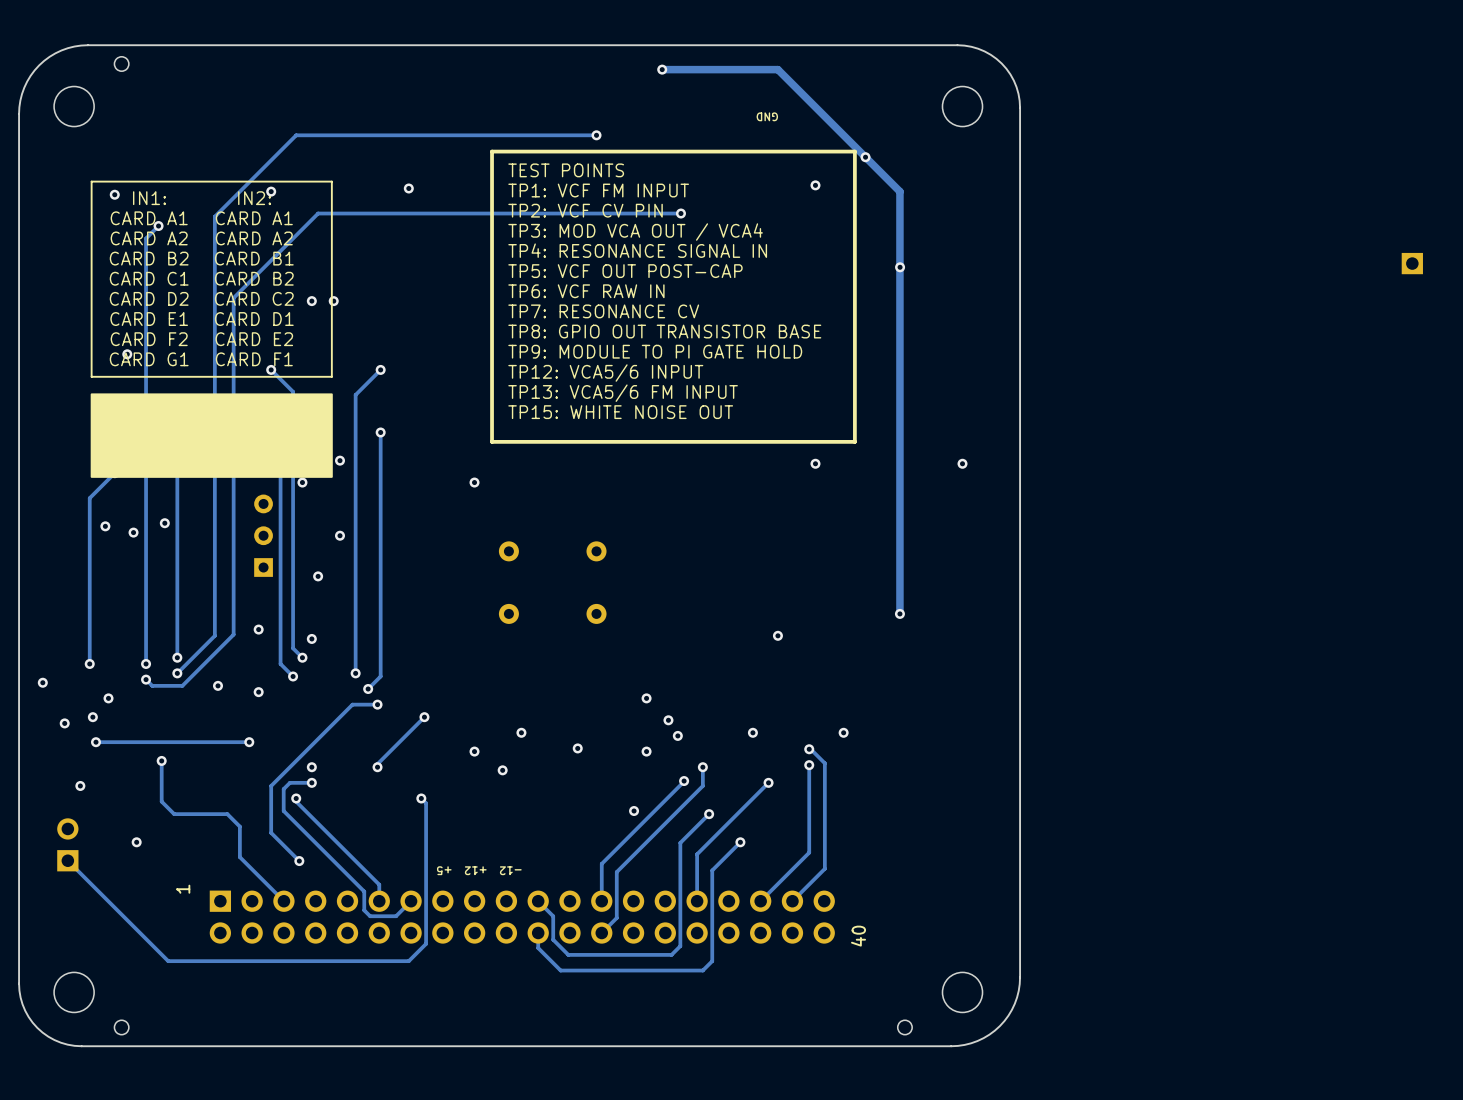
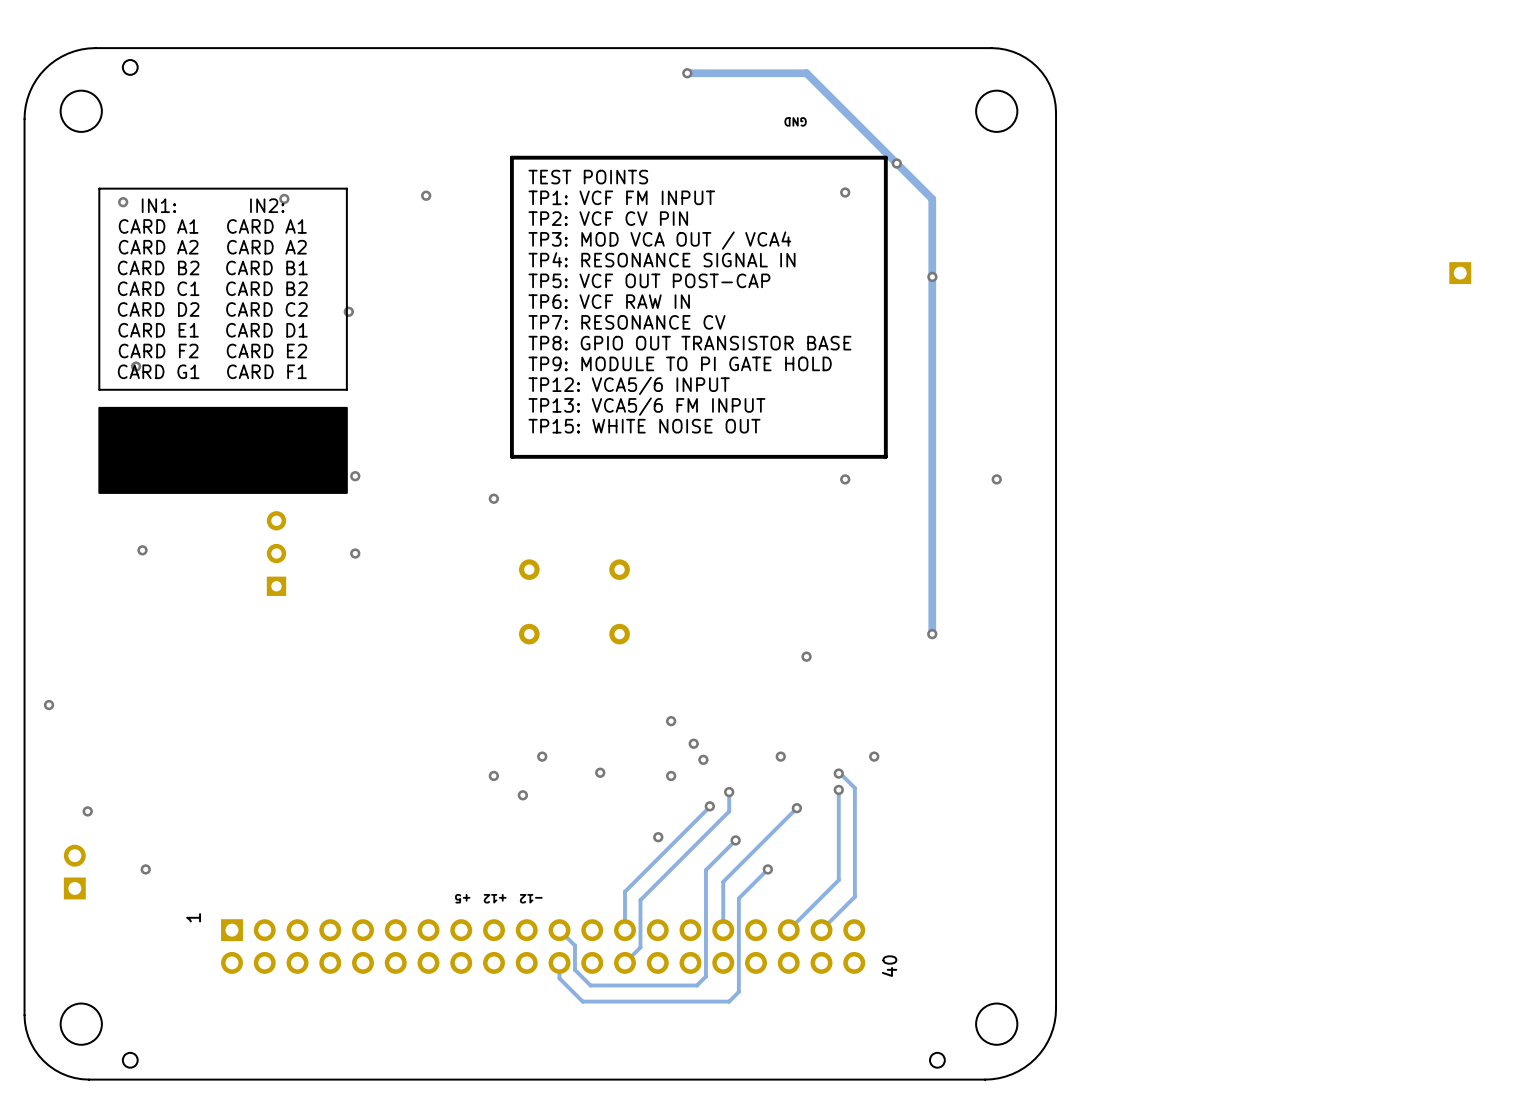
track: (596, 135) (296, 135) (214, 216) (214, 635) (177, 673) -> none
via: (596, 135) -> none
track: (680, 213) (318, 213) (233, 297) (233, 634) (182, 685) (152, 685) (146, 679) -> none
via: (680, 213) -> none
track: (158, 226) (146, 238) (146, 663) -> none
via: (158, 226) -> none
via: (311, 301) -> none
track: (271, 369) (293, 391) (293, 648) (302, 657) -> none
via: (271, 369) -> none
track: (380, 369) (355, 394) (355, 673) -> none
via: (380, 369) -> none
track: (177, 423) (177, 657) -> none
track: (271, 432) (280, 441) (280, 663) (293, 676) -> none
track: (380, 432) (380, 676) (368, 689) -> none
via: (380, 432) -> none
track: (114, 473) (89, 498) (89, 663) -> none
via: (302, 482) -> none
via: (164, 523) -> none
via: (105, 526) -> none
via: (318, 576) -> none
via: (258, 629) -> none
via: (311, 638) -> none
via: (177, 657) -> none
via: (302, 657) -> none
via: (89, 663) -> none
via: (146, 663) -> none
via: (177, 673) -> none
via: (355, 673) -> none
via: (293, 676) -> none
via: (146, 679) -> none
via: (218, 685) -> none
via: (368, 689) -> none
via: (258, 692) -> none
via: (108, 698) -> none
track: (377, 704) (352, 704) (271, 785) (271, 832) (299, 861) -> none
via: (377, 704) -> none
via: (92, 717) -> none
track: (424, 717) (377, 764) (377, 767) -> none
via: (424, 717) -> none
via: (64, 723) -> none
via: (96, 742) -> none
track: (249, 742) (96, 742) -> none
via: (249, 742) -> none
track: (161, 760) (161, 801) (174, 814) (227, 814) (239, 826) (239, 857) (283, 901) -> none
via: (161, 760) -> none
via: (311, 767) -> none
via: (377, 767) -> none
track: (311, 782) (289, 782) (283, 789) (283, 811) (364, 891) (364, 910) (370, 916) (396, 916) (411, 901) -> none
via: (311, 782) -> none
track: (296, 798) (296, 801) (379, 884) (379, 901) -> none
via: (296, 798) -> none
track: (421, 798) (426, 803) (426, 943) (408, 961) (168, 961) (67, 860) -> none
via: (421, 798) -> none
via: (299, 861) -> none

